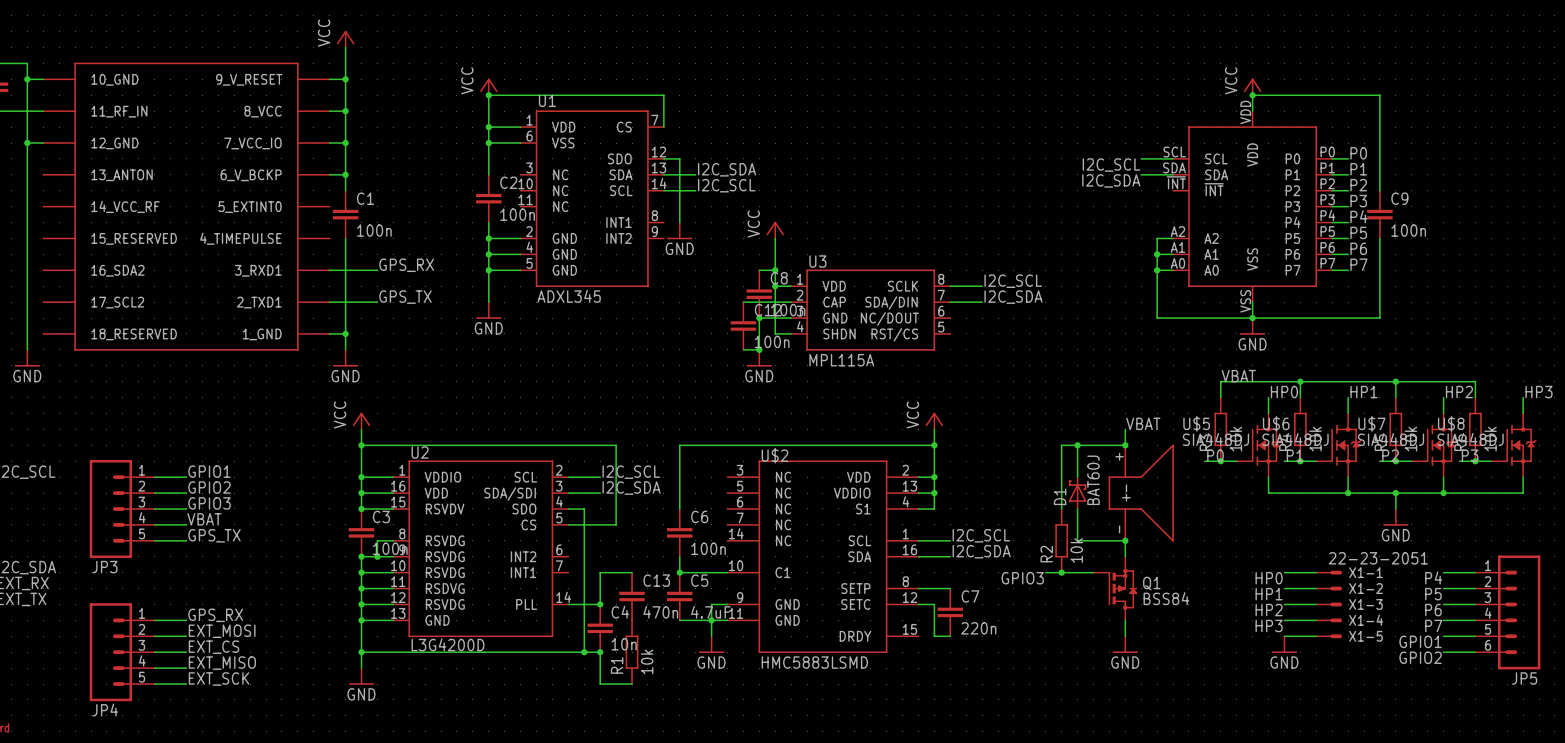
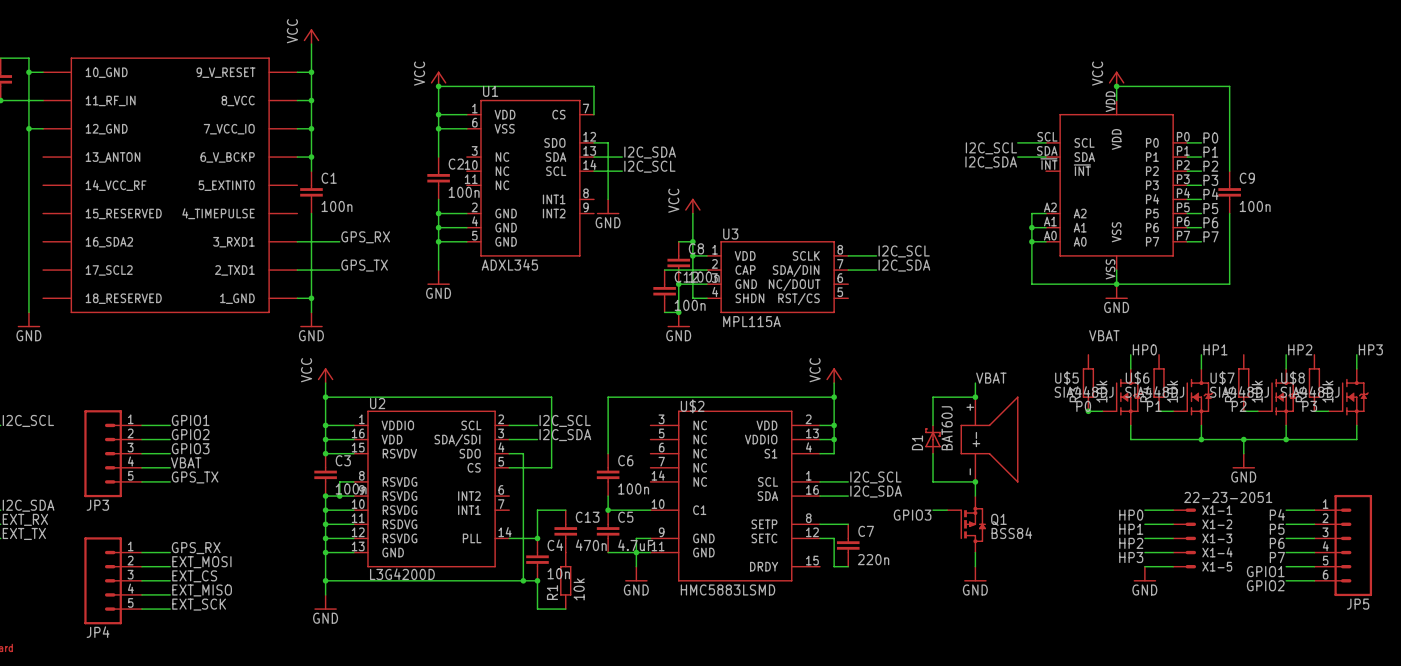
wire: (1300, 381) (1300, 397) -> none
junction: (1300, 381) -> none
wire: (1395, 381) (1395, 397) -> none
junction: (1395, 381) -> none
wire: (1220, 397) (1220, 381) (1475, 381) (1475, 397) -> none
label position: VBAT (1143, 423) -> VBAT (991, 378)
wire: (1125, 429) (1125, 445) (1093, 445) -> (975, 383) (975, 397)
wire: (1061, 445) (1061, 508) -> (947, 397) (933, 397) (933, 425)
wire: (1077, 445) (1077, 477) -> none
junction: (1077, 445) -> none
junction: none -> (975, 397)
junction: (1125, 445) -> none
wire: (1204, 461) (1220, 461) -> none
wire: (1284, 461) (1300, 461) -> none
junction: (1300, 461) -> none
wire: (1379, 461) (1395, 461) -> none
junction: (1395, 461) -> none
wire: (1459, 461) (1475, 461) -> none
junction: (1475, 461) -> none
D1 position: (1077, 493) -> (933, 439)
part position: (1141, 493) -> (989, 439)
wire: (1077, 508) (1077, 540) -> (933, 453) (933, 481) (961, 481)
R2: 10k (1061, 540) -> none
wire: (1093, 540) (1125, 540) (1125, 556) -> (975, 481) (975, 496)
junction: none -> (975, 481)
junction: (1125, 540) -> none
junction: (1061, 572) -> none
Q1 position: (1115, 588) -> (966, 524)
wire: (1125, 620) (1125, 636) -> (975, 552) (975, 566)
power symbol position: GND (1125, 644) -> GND (975, 574)

